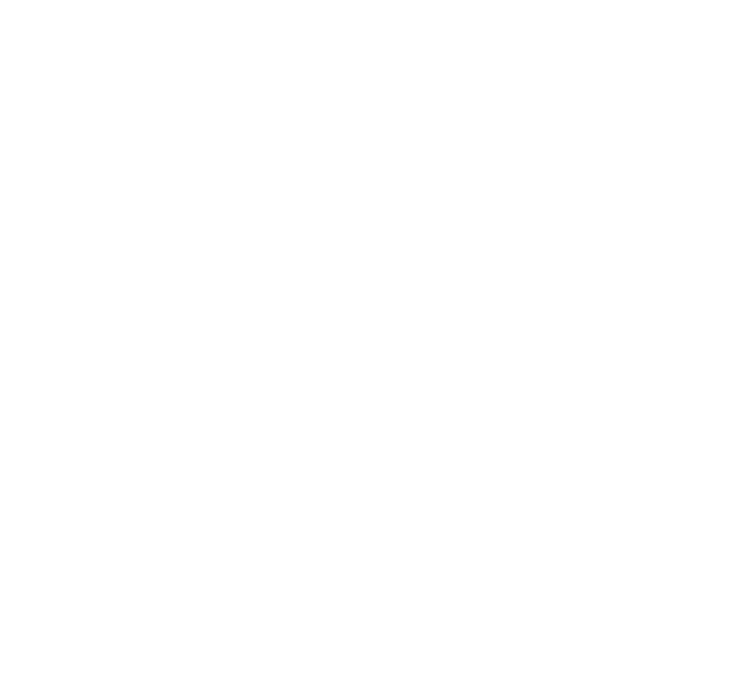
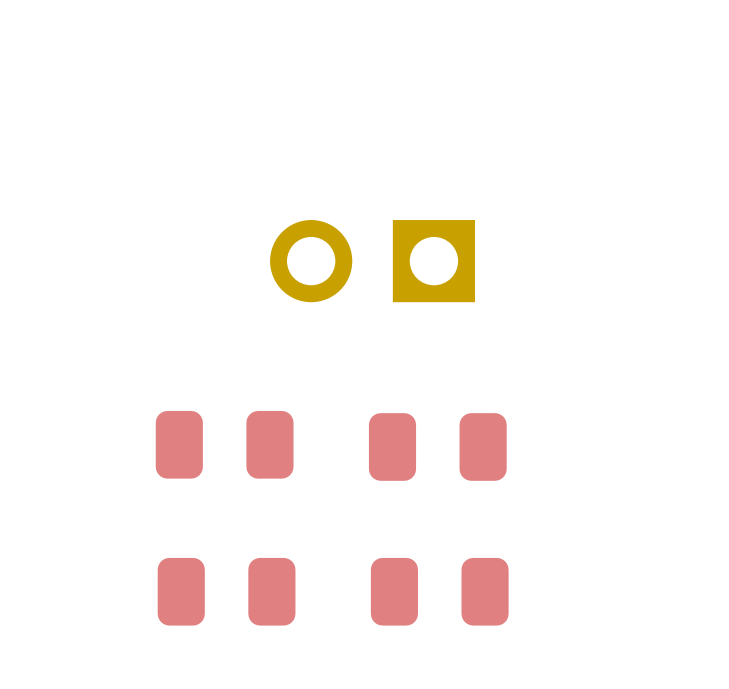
part: none -> (372, 261)
part: none -> (224, 444)
part: none -> (437, 446)
part: none -> (226, 591)
part: none -> (439, 591)

